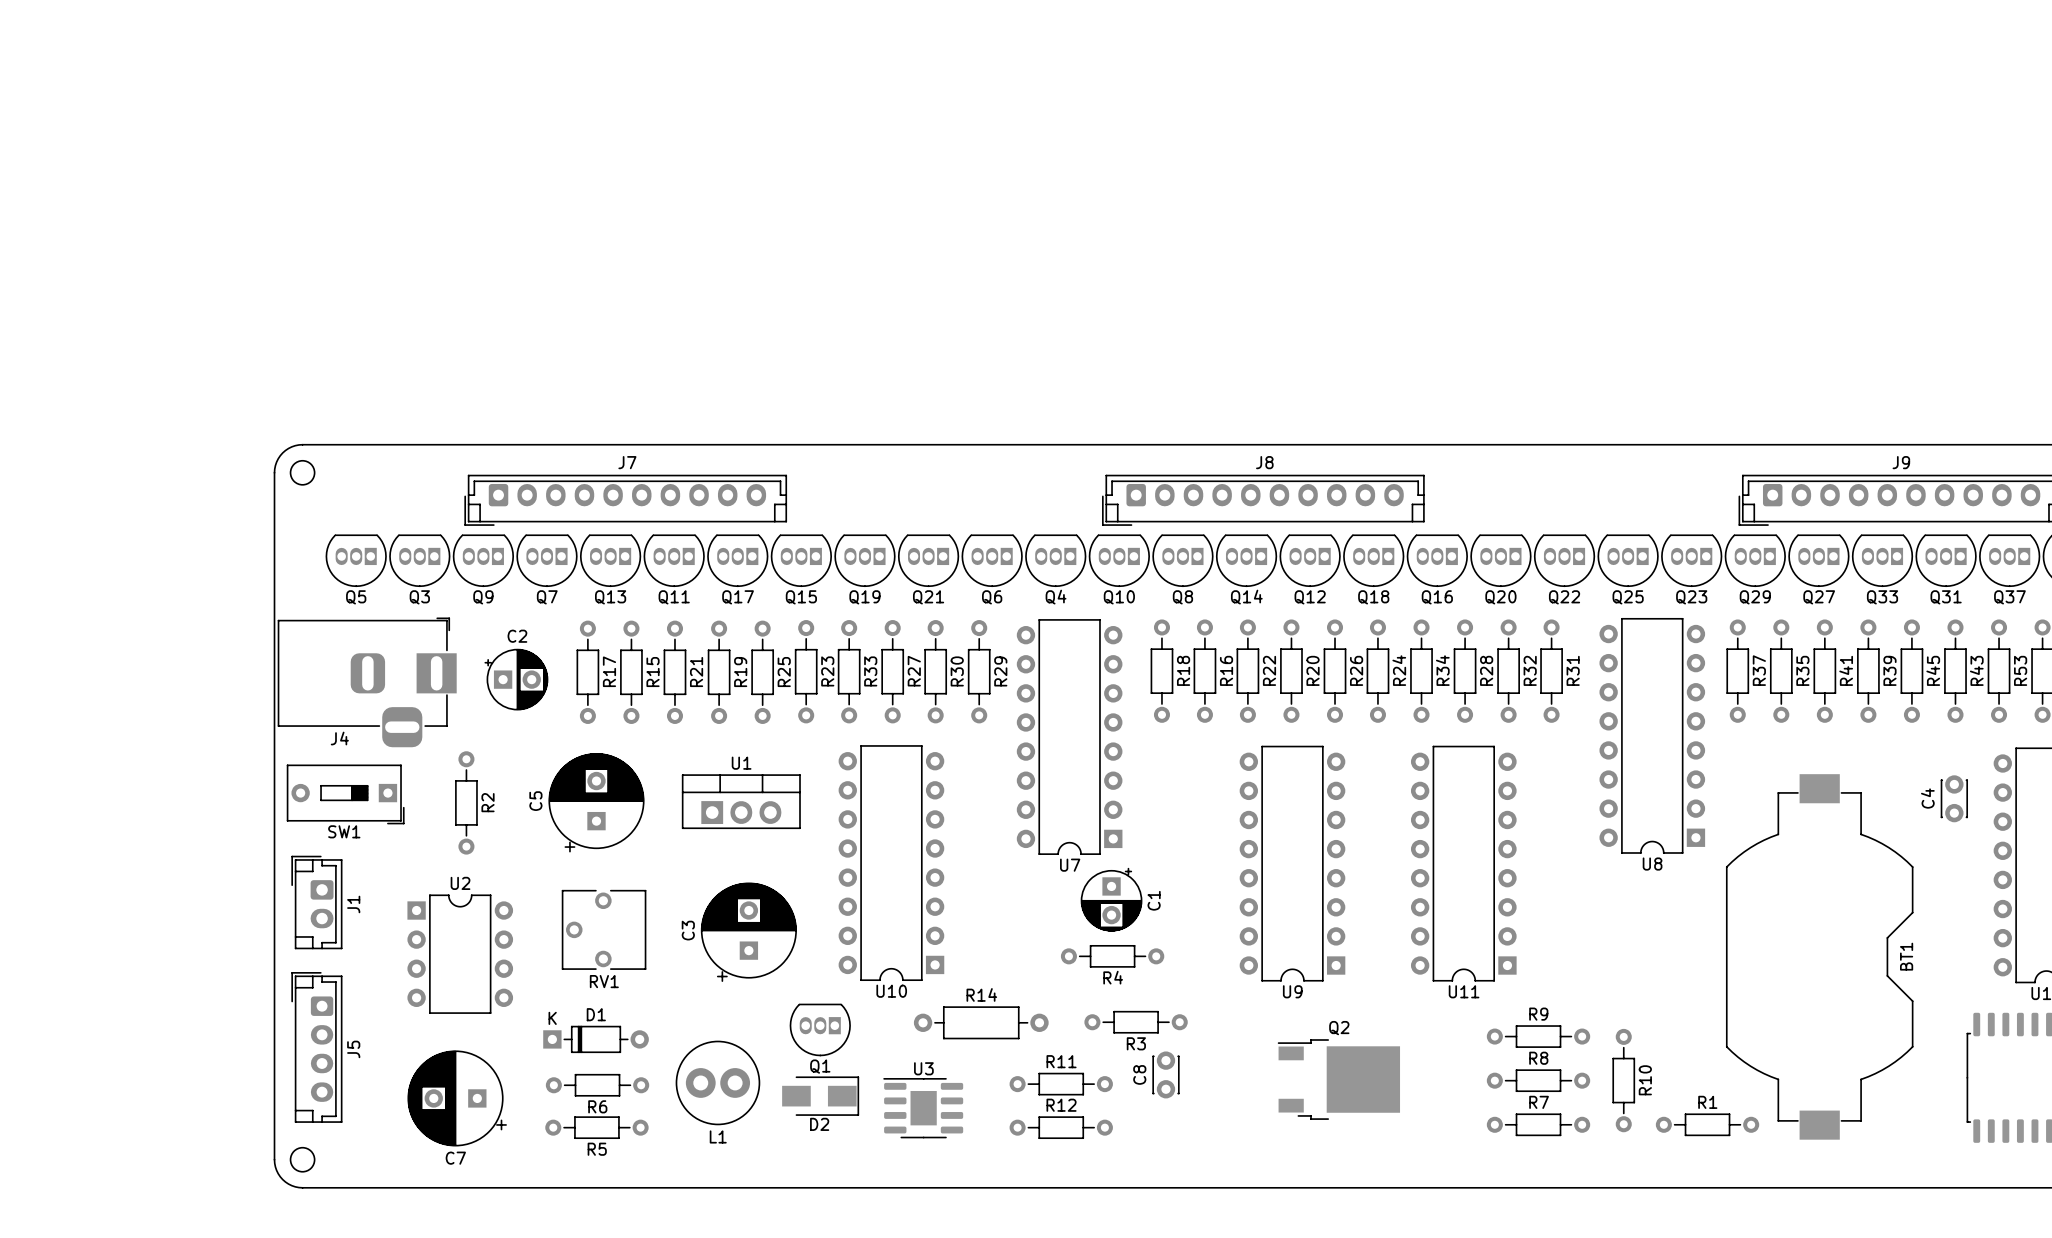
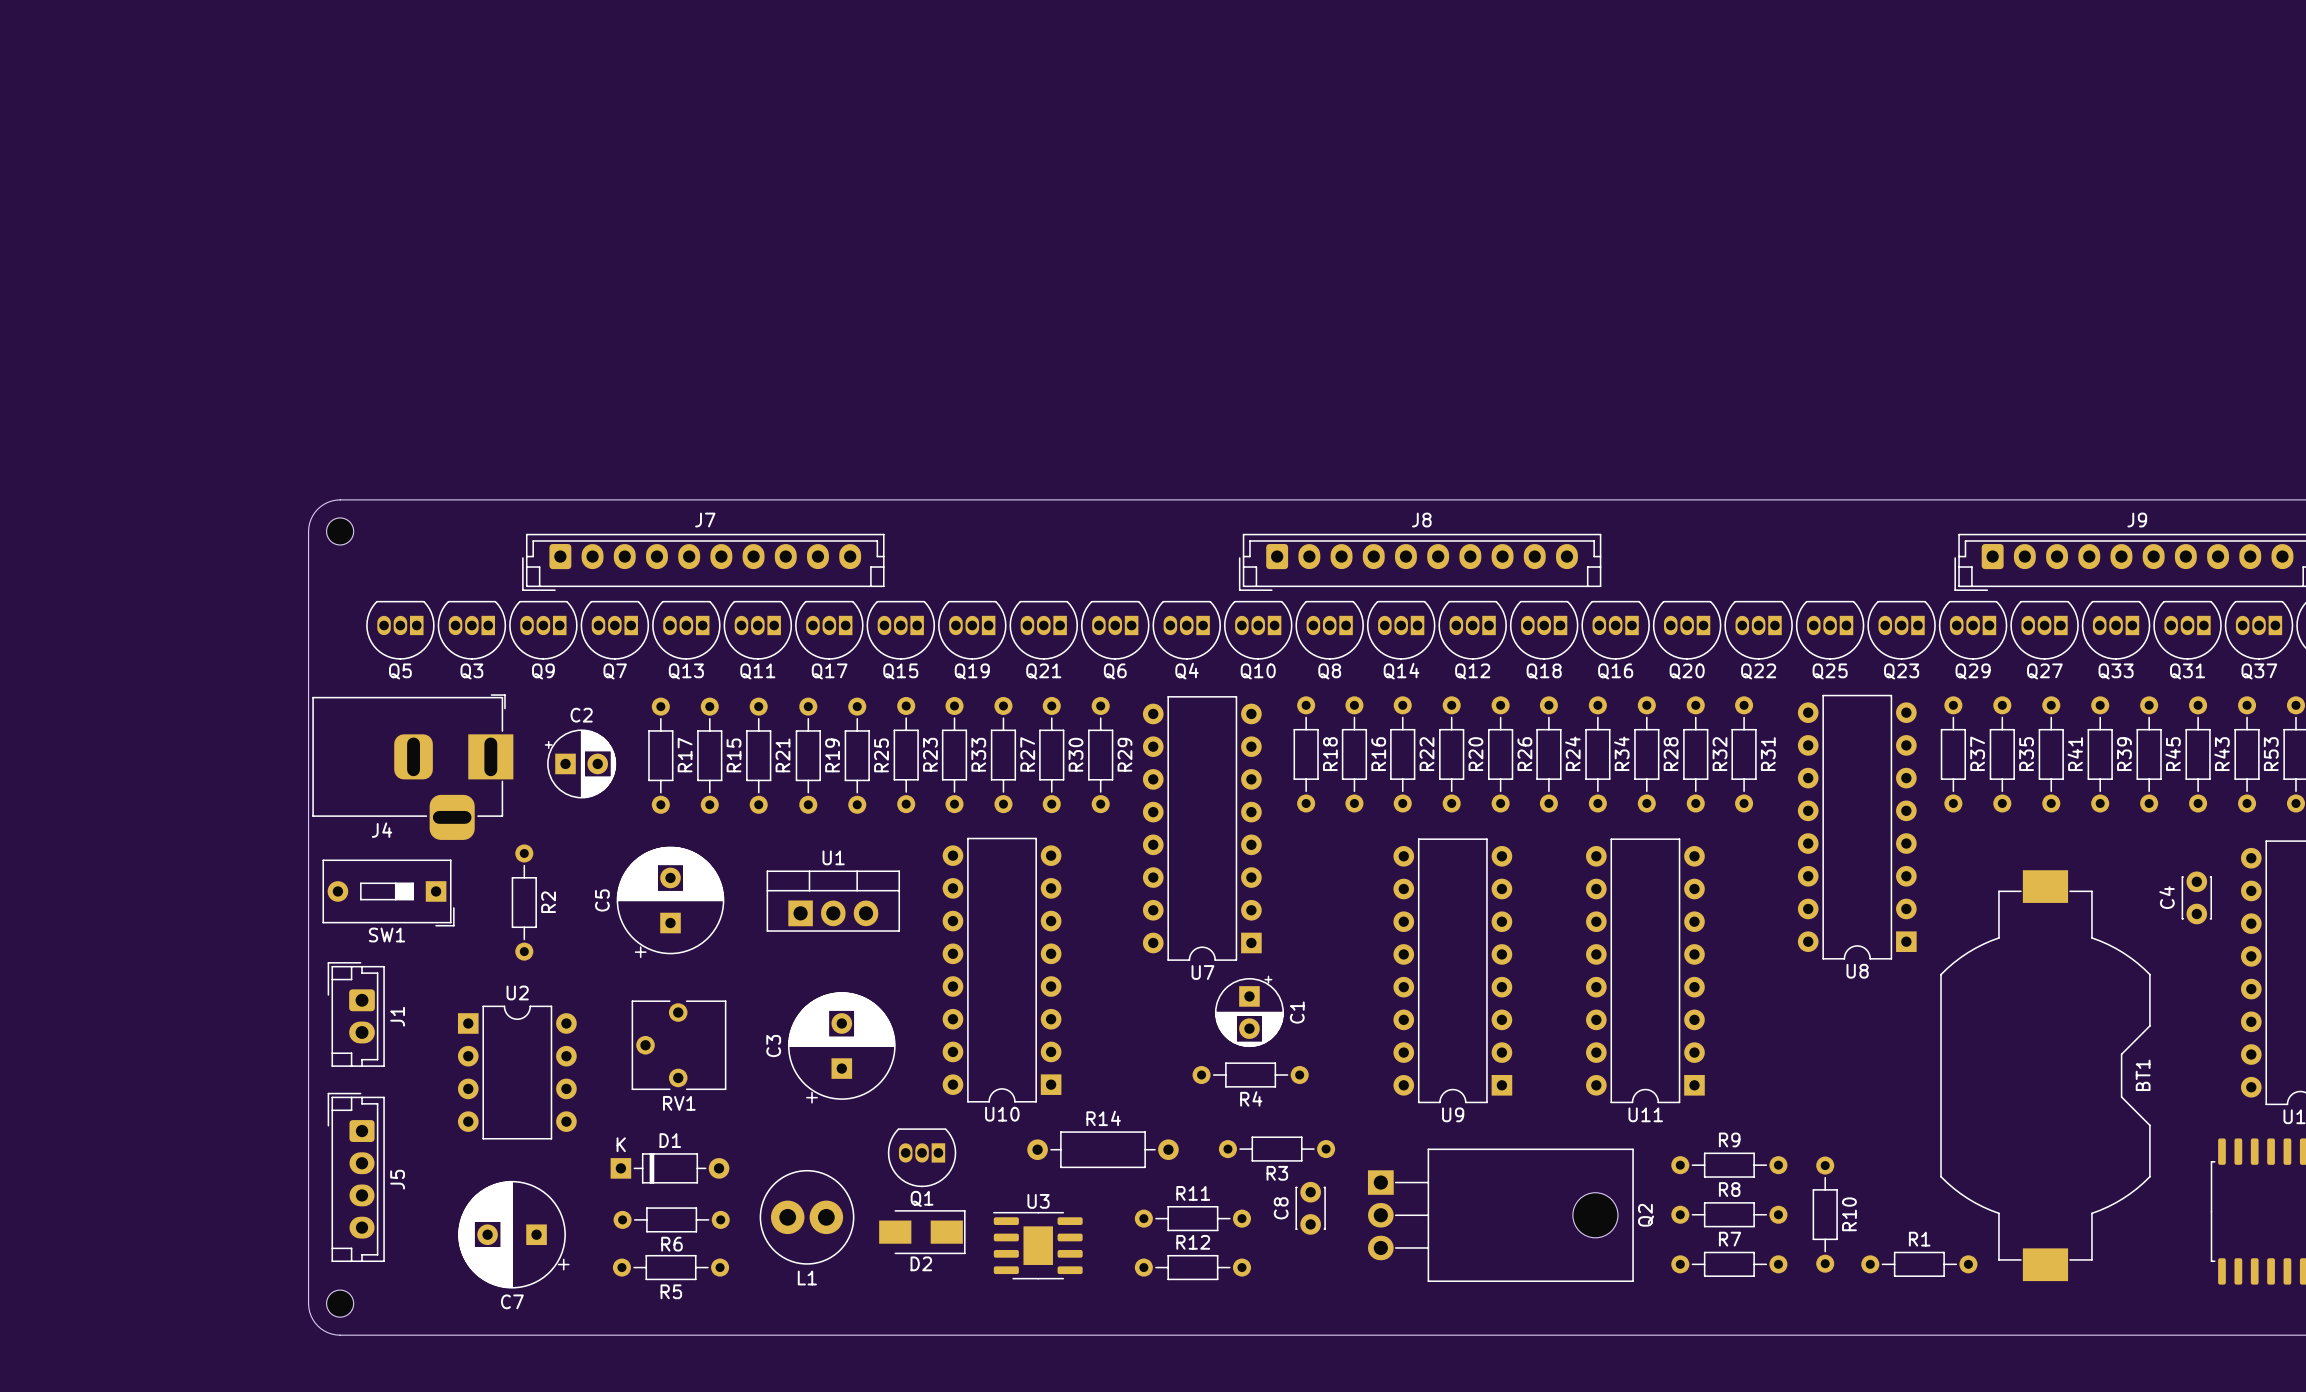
Q2 name position: Q2 (1339, 1028) -> Q2 (1646, 1215)
Q2 footprint: [1277, 1039, 1401, 1120] -> [1367, 1148, 1634, 1282]

